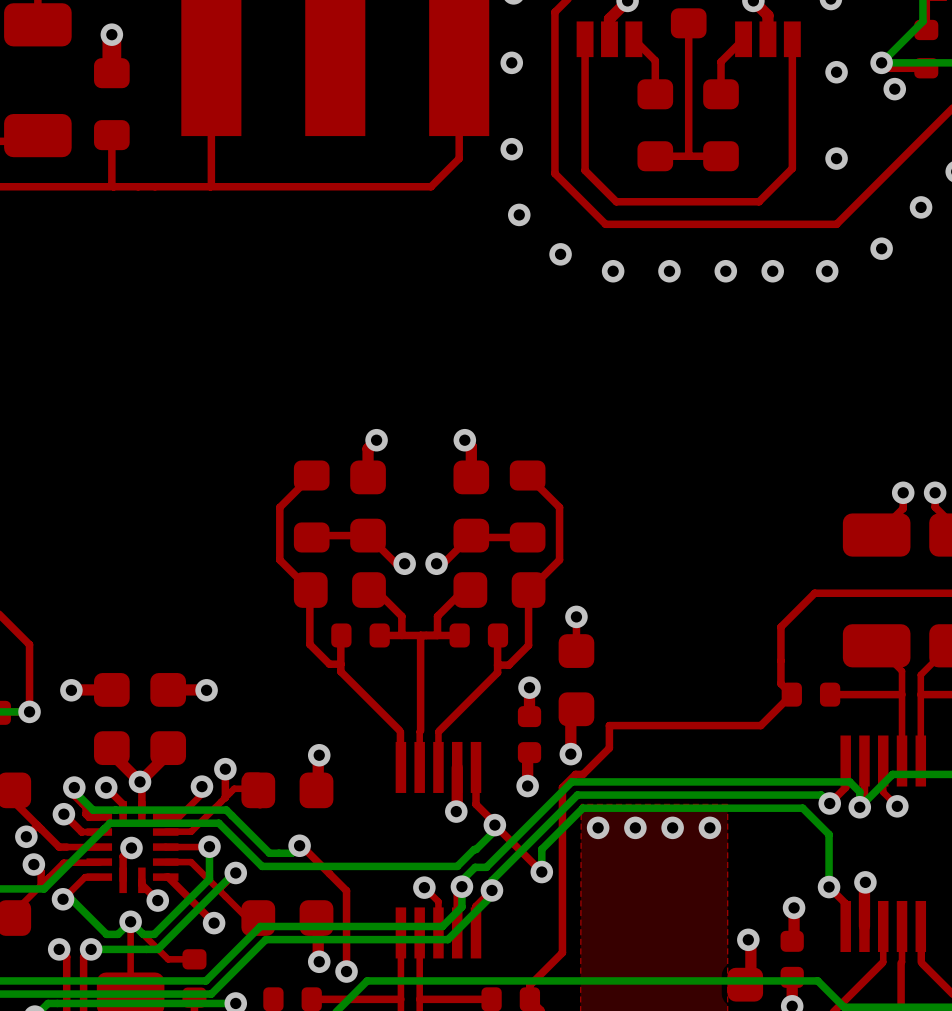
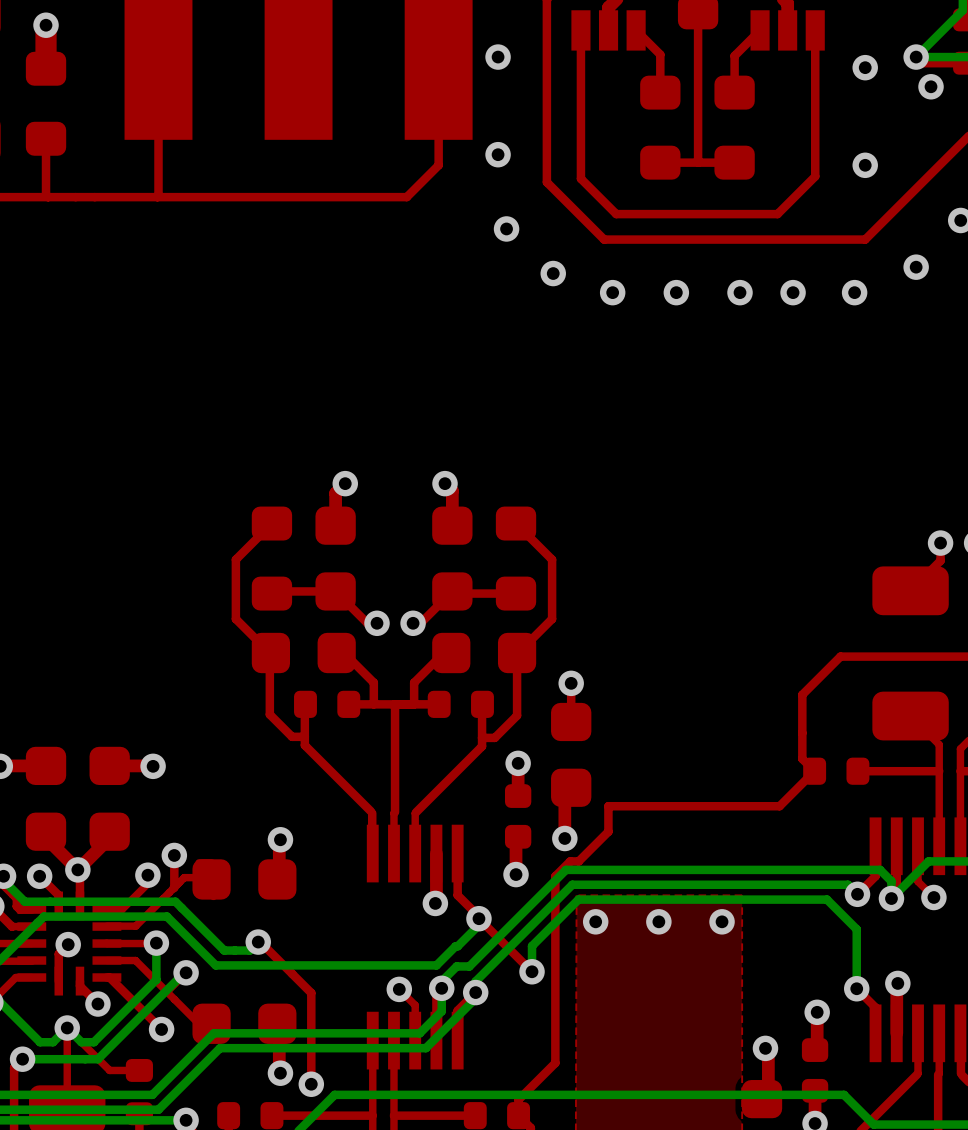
via: (635, 827) -> none
via: none -> (658, 921)
via: (672, 827) -> none

